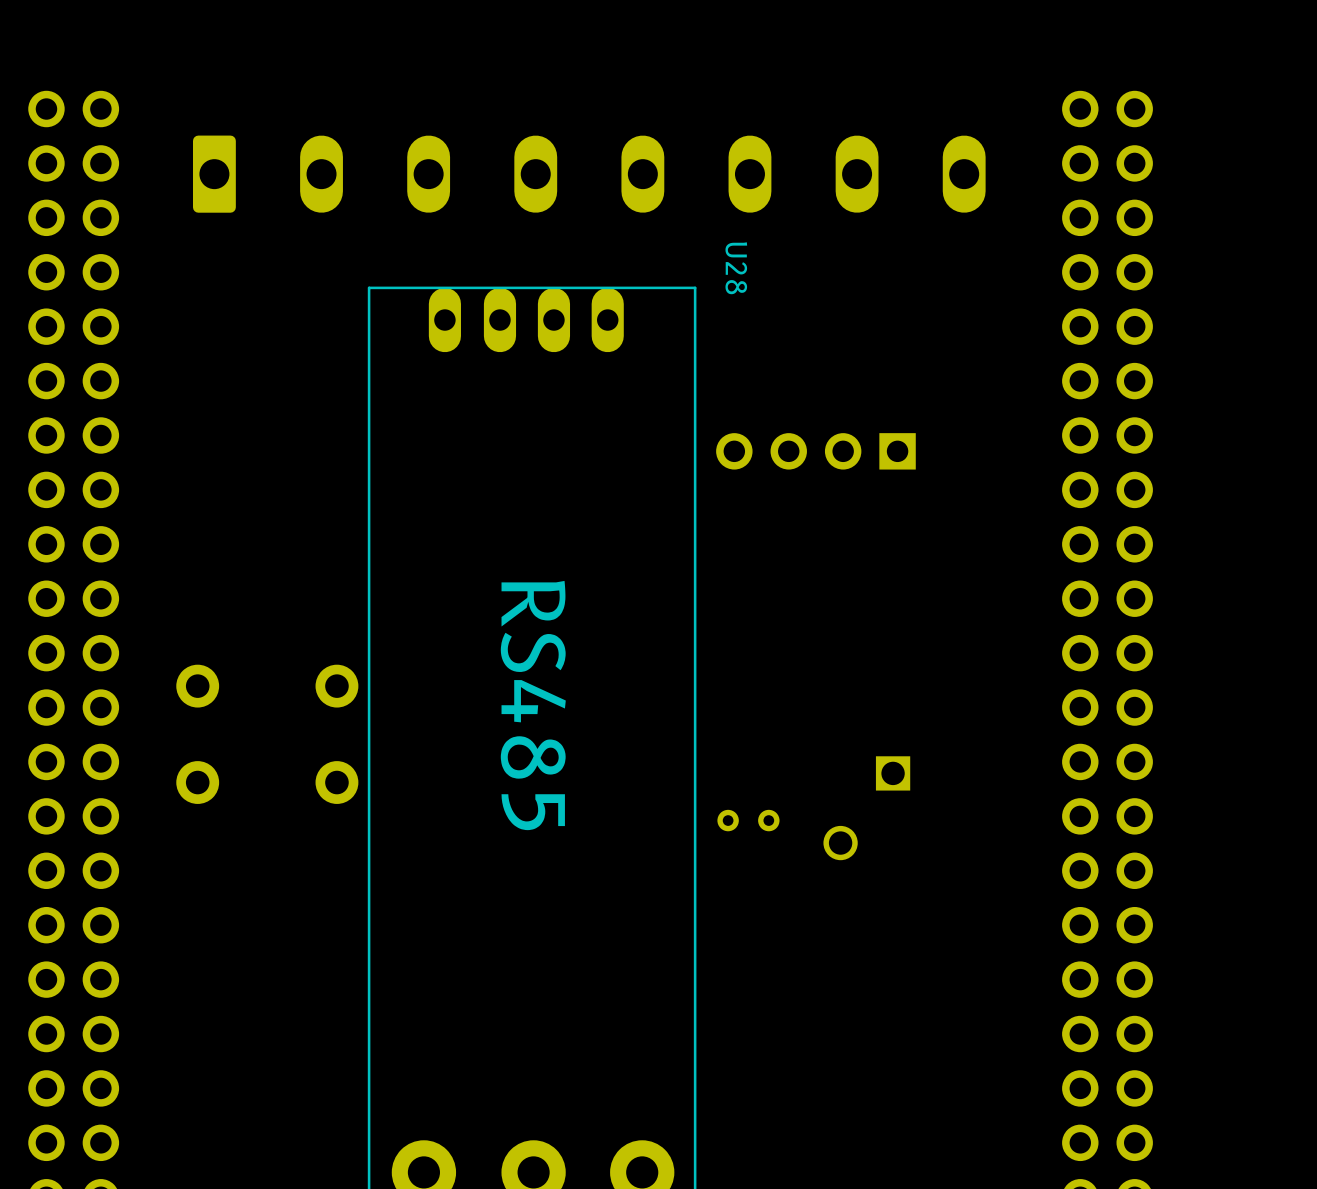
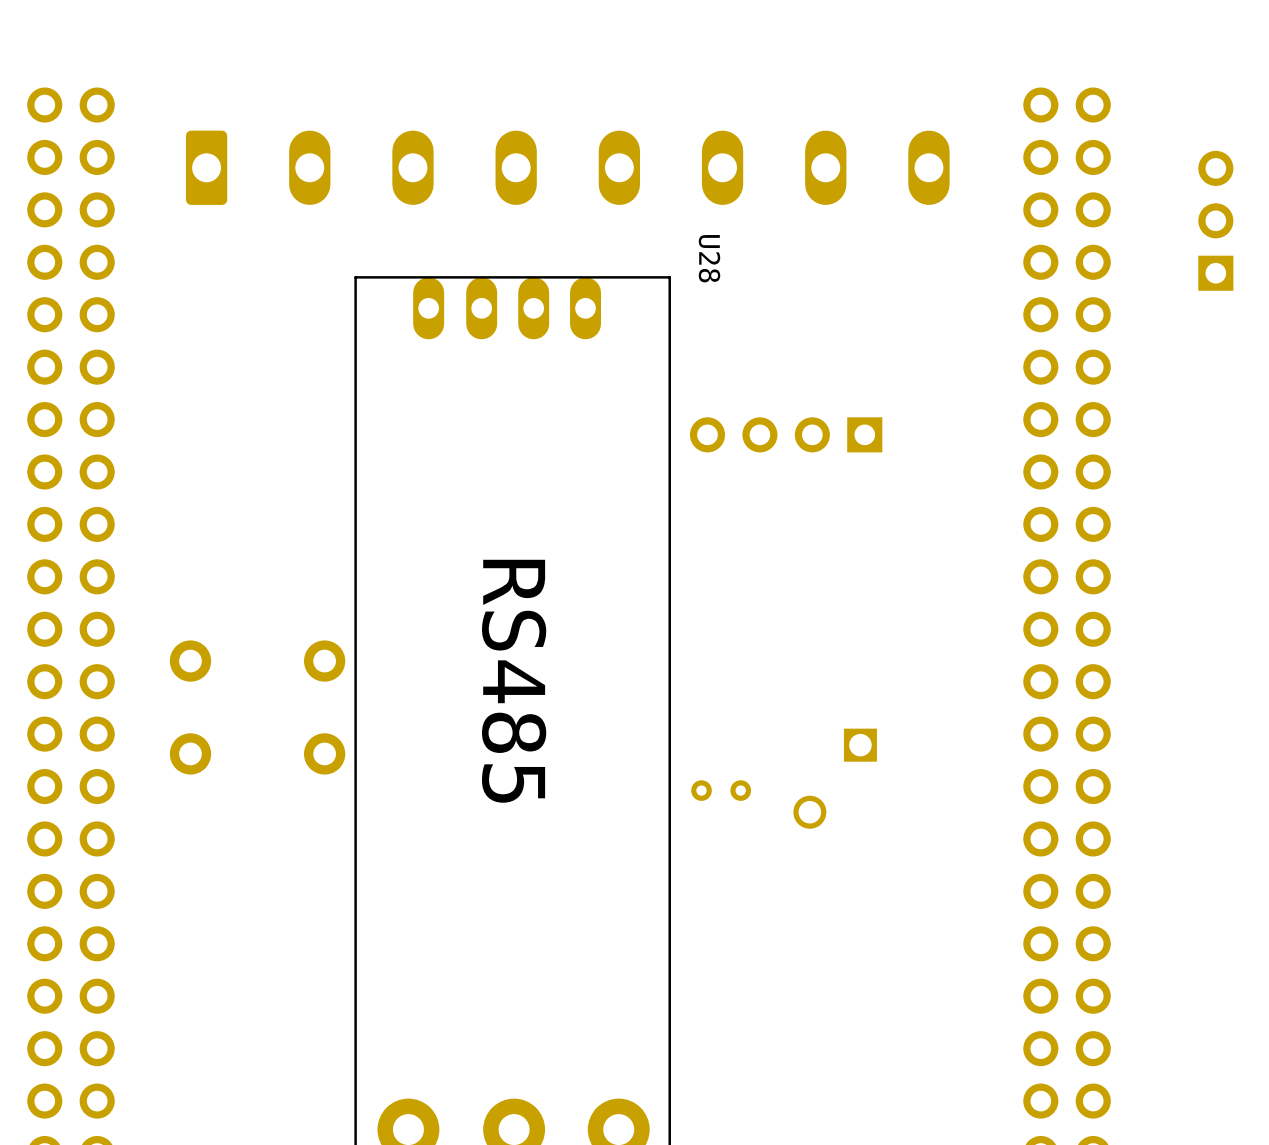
part: none -> (1215, 220)

